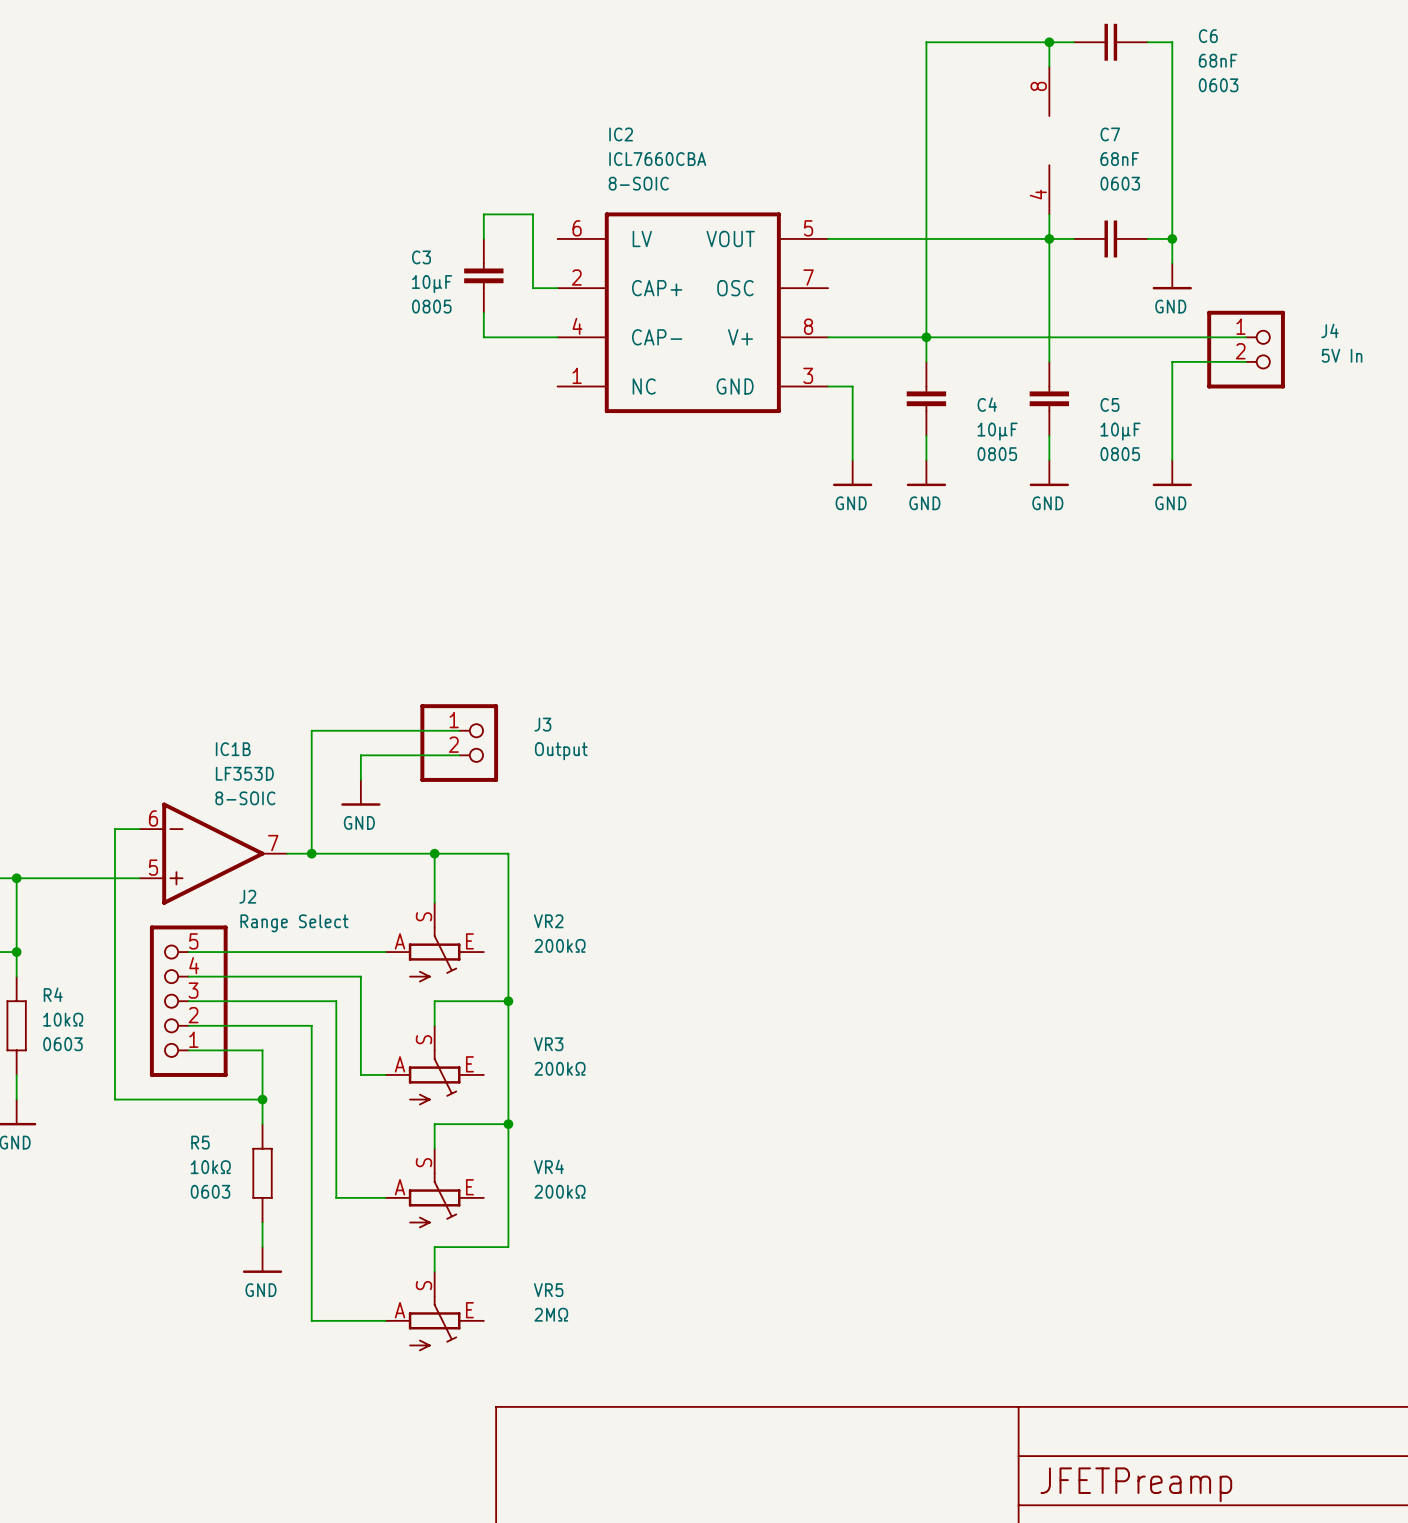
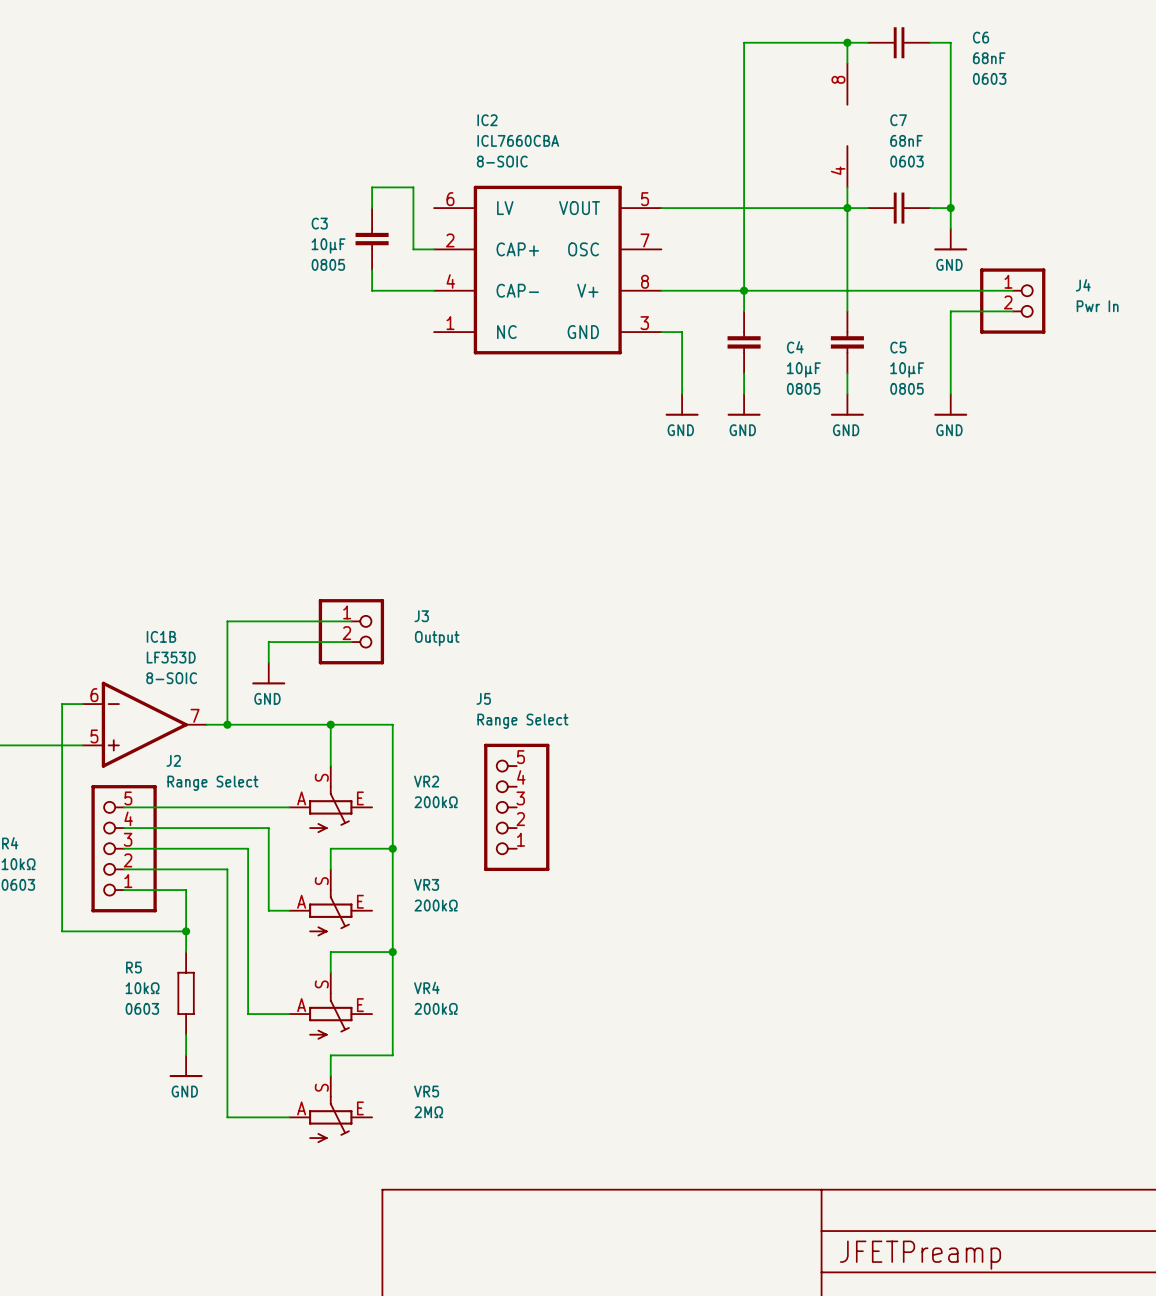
J4 value: 5V In (1342, 355) -> Pwr In (1097, 306)
J5: none -> Range Select (516, 807)

